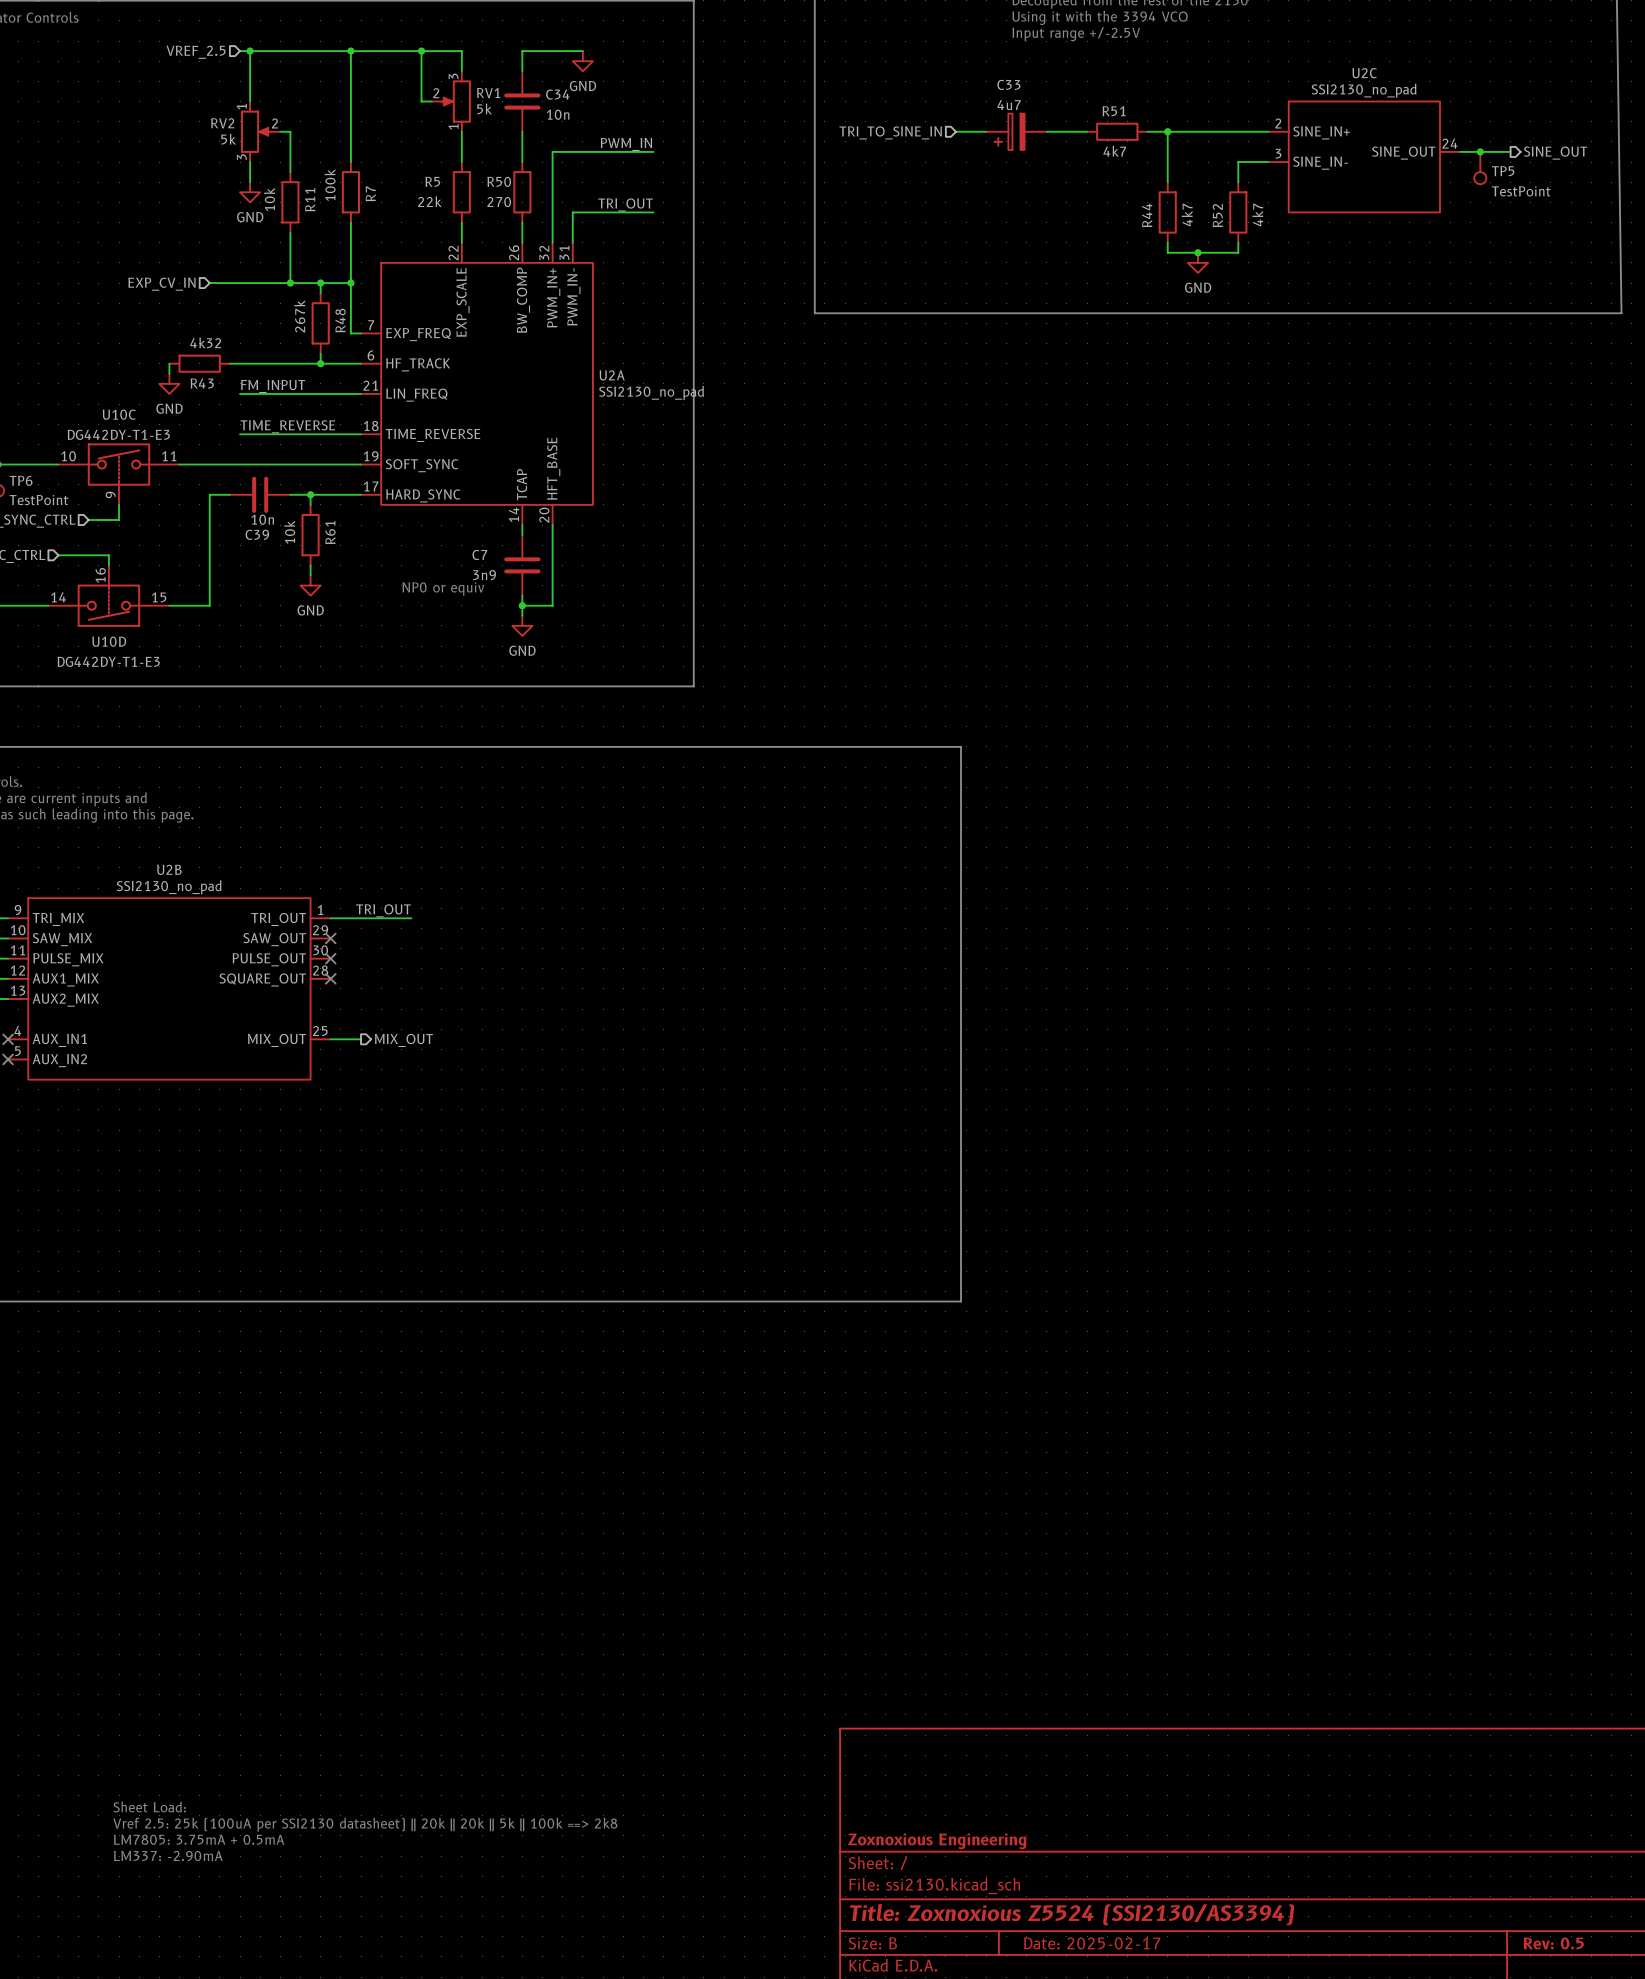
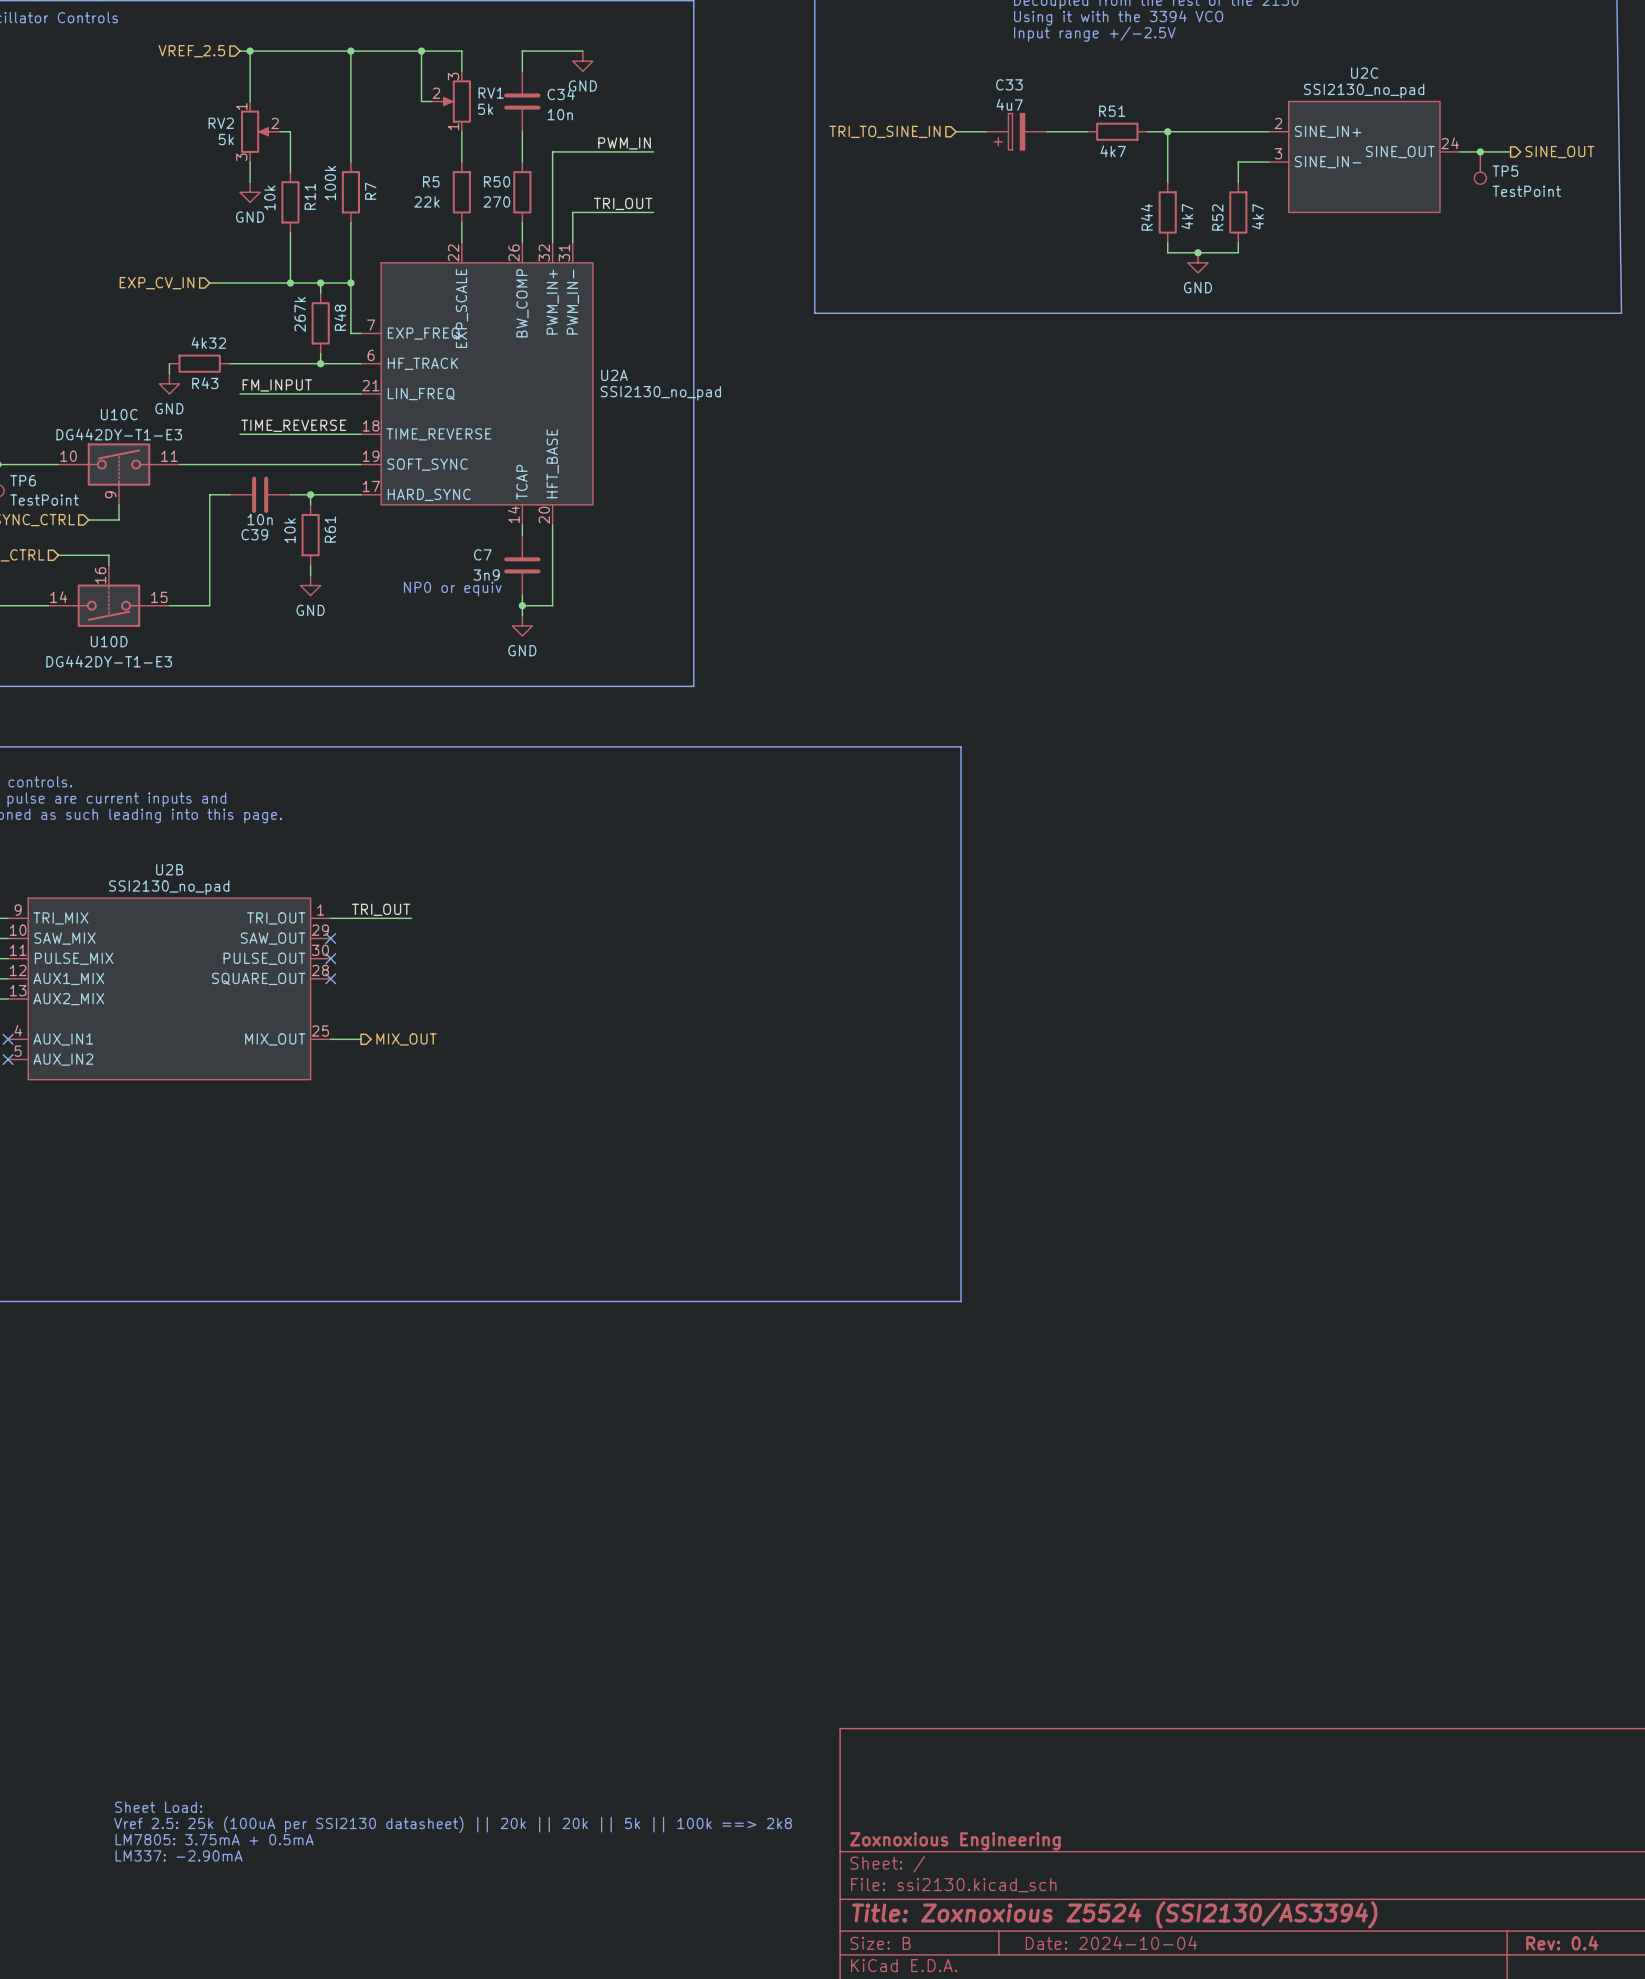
title block: Date: 2025-02-17 (1092, 1943) -> Date: 2024-10-04 (1111, 1943)
title block: Rev: 0.5 (1553, 1943) -> Rev: 0.4 (1562, 1943)

